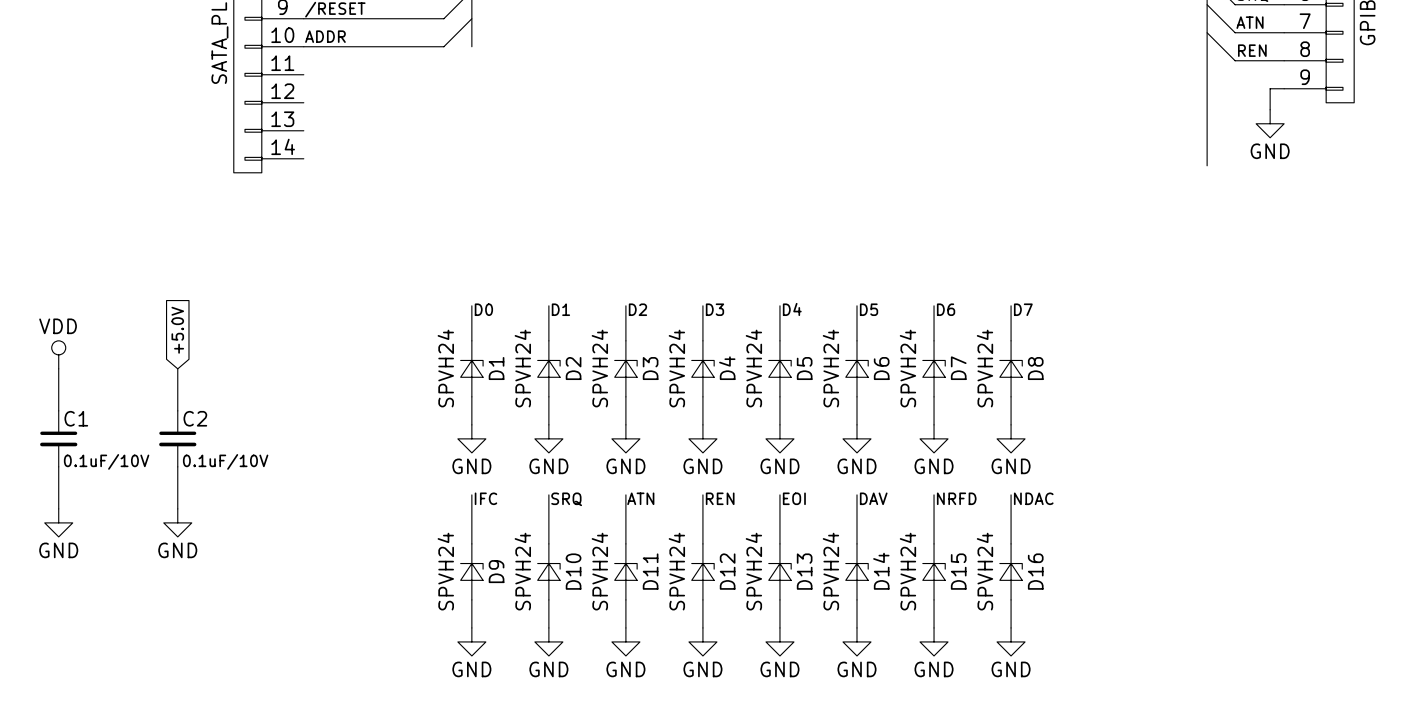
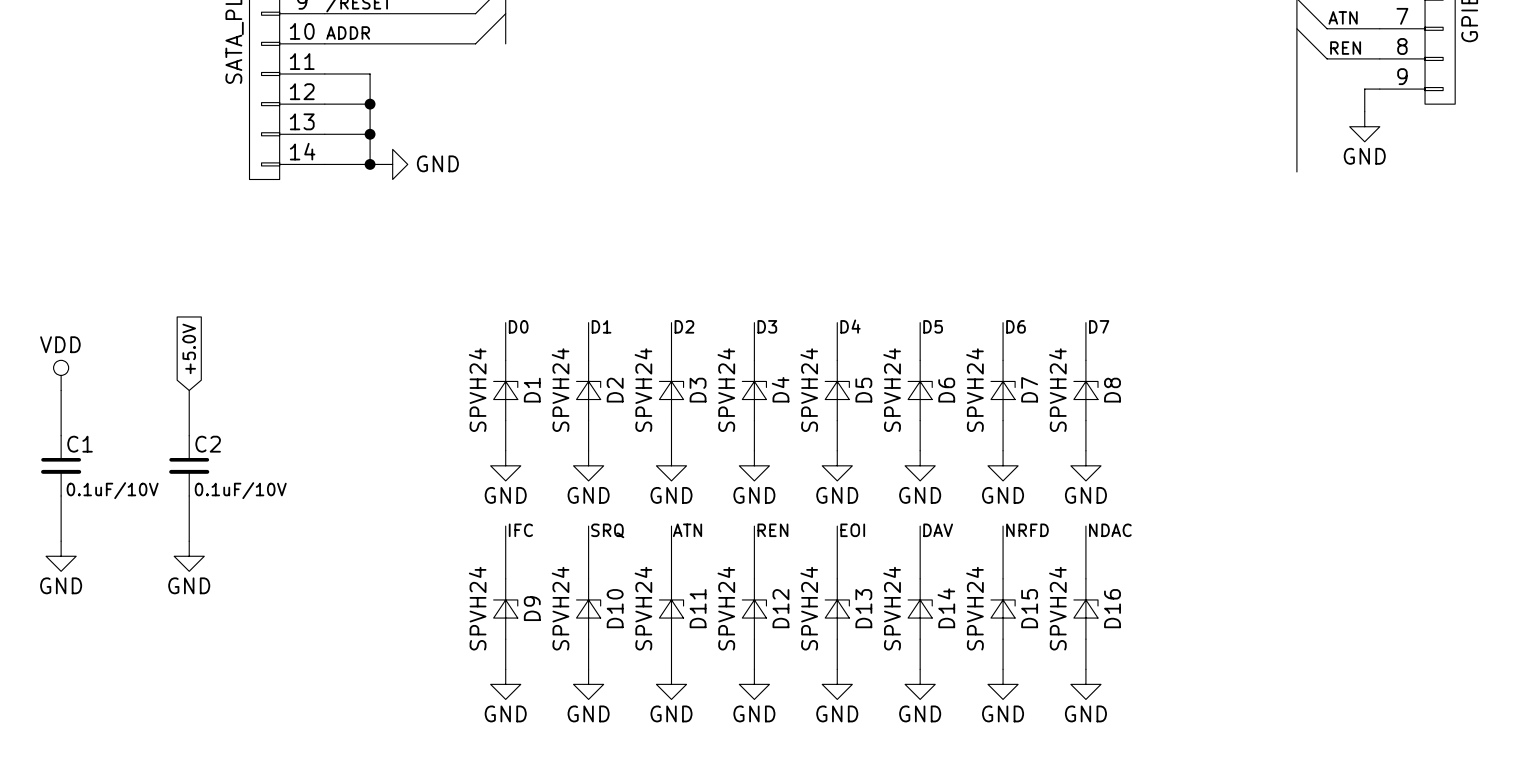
wire: none -> (324, 73) (370, 73) (370, 164)
wire: none -> (324, 104) (370, 104)
junction: none -> (370, 104)
wire: none -> (324, 134) (370, 134)
junction: none -> (370, 134)
wire: none -> (324, 164) (377, 164)
junction: none -> (370, 164)
power symbol: none -> GND (392, 164)

